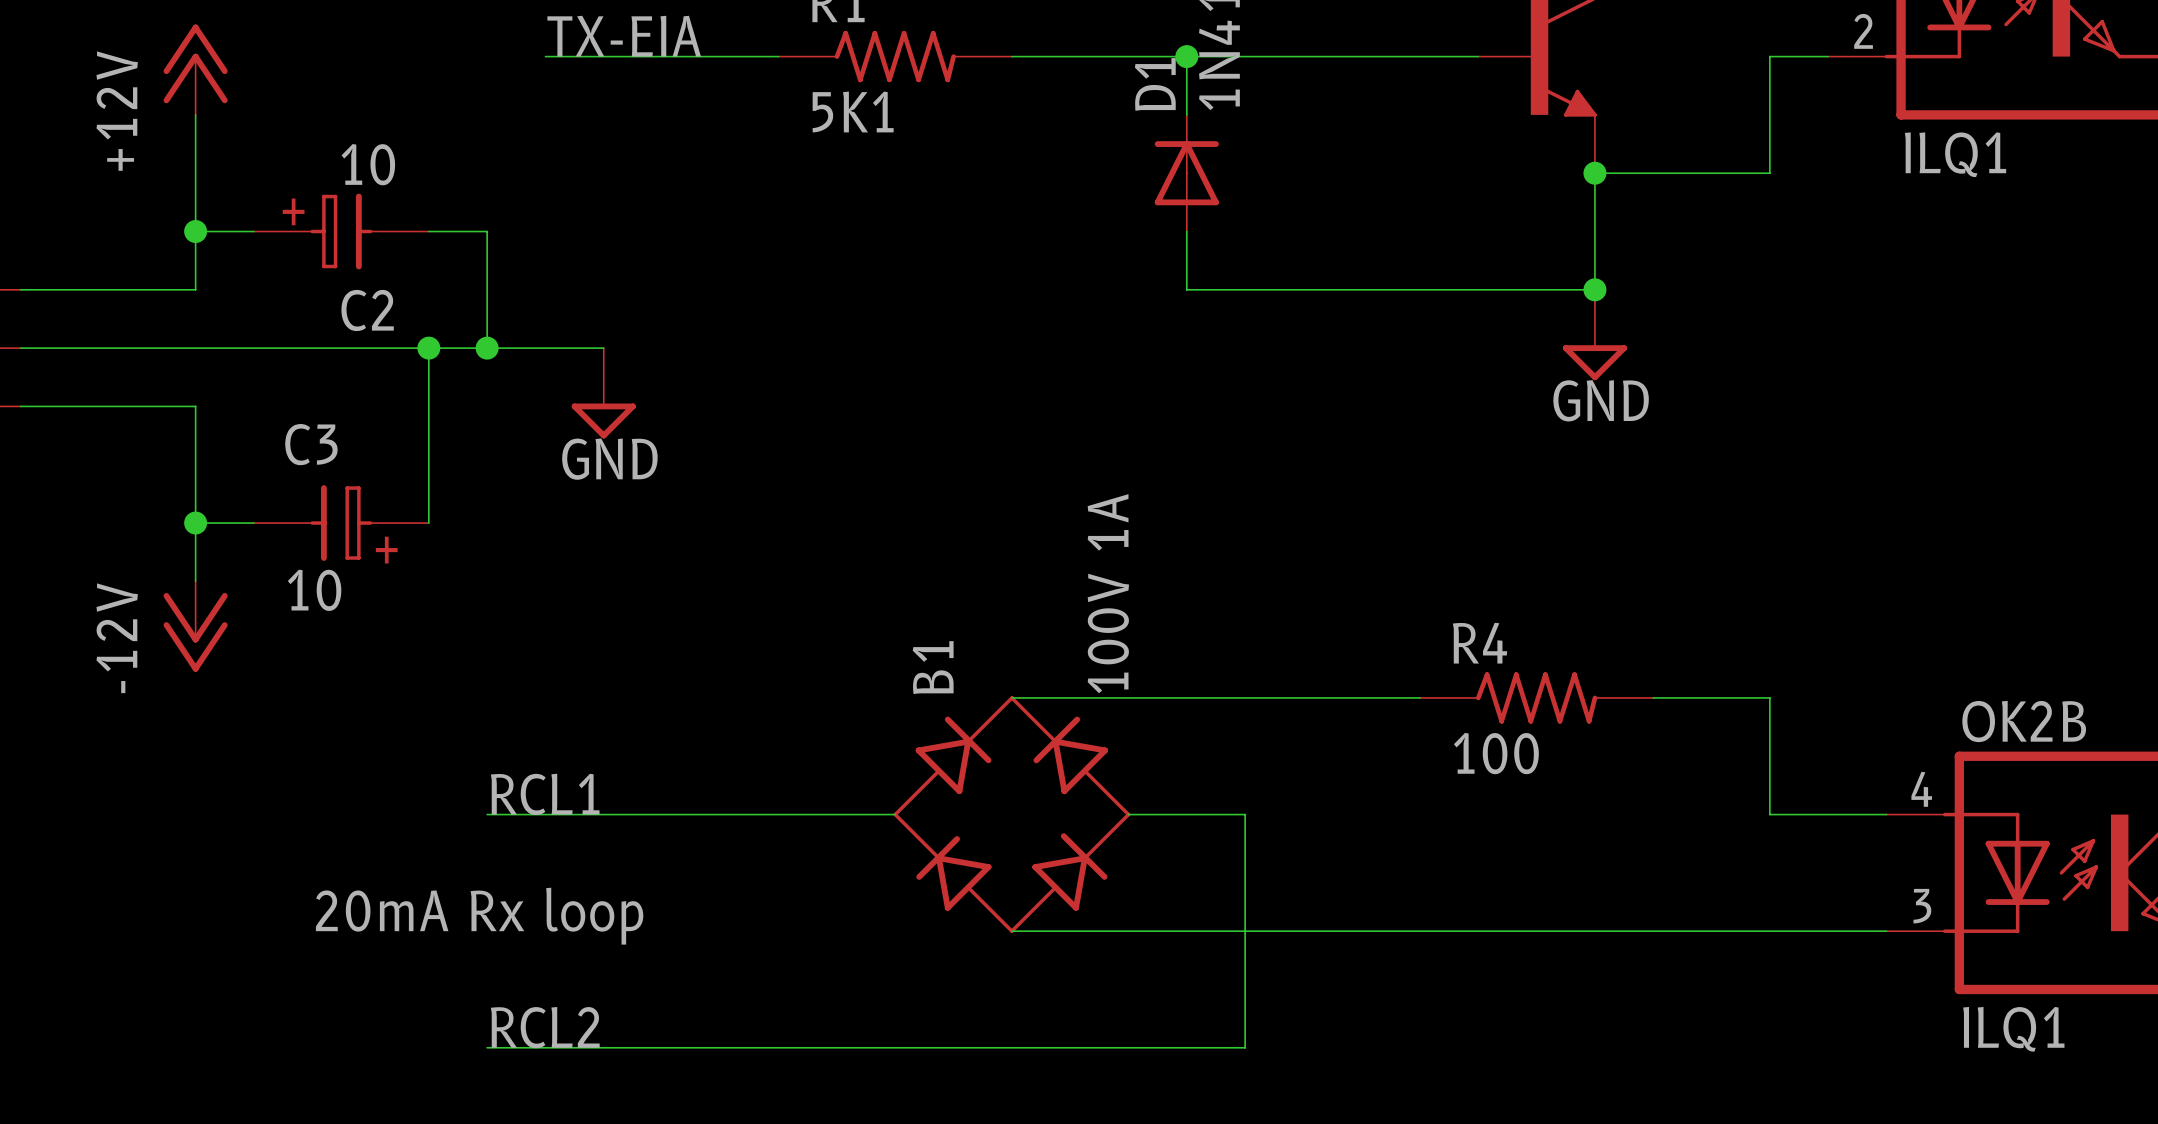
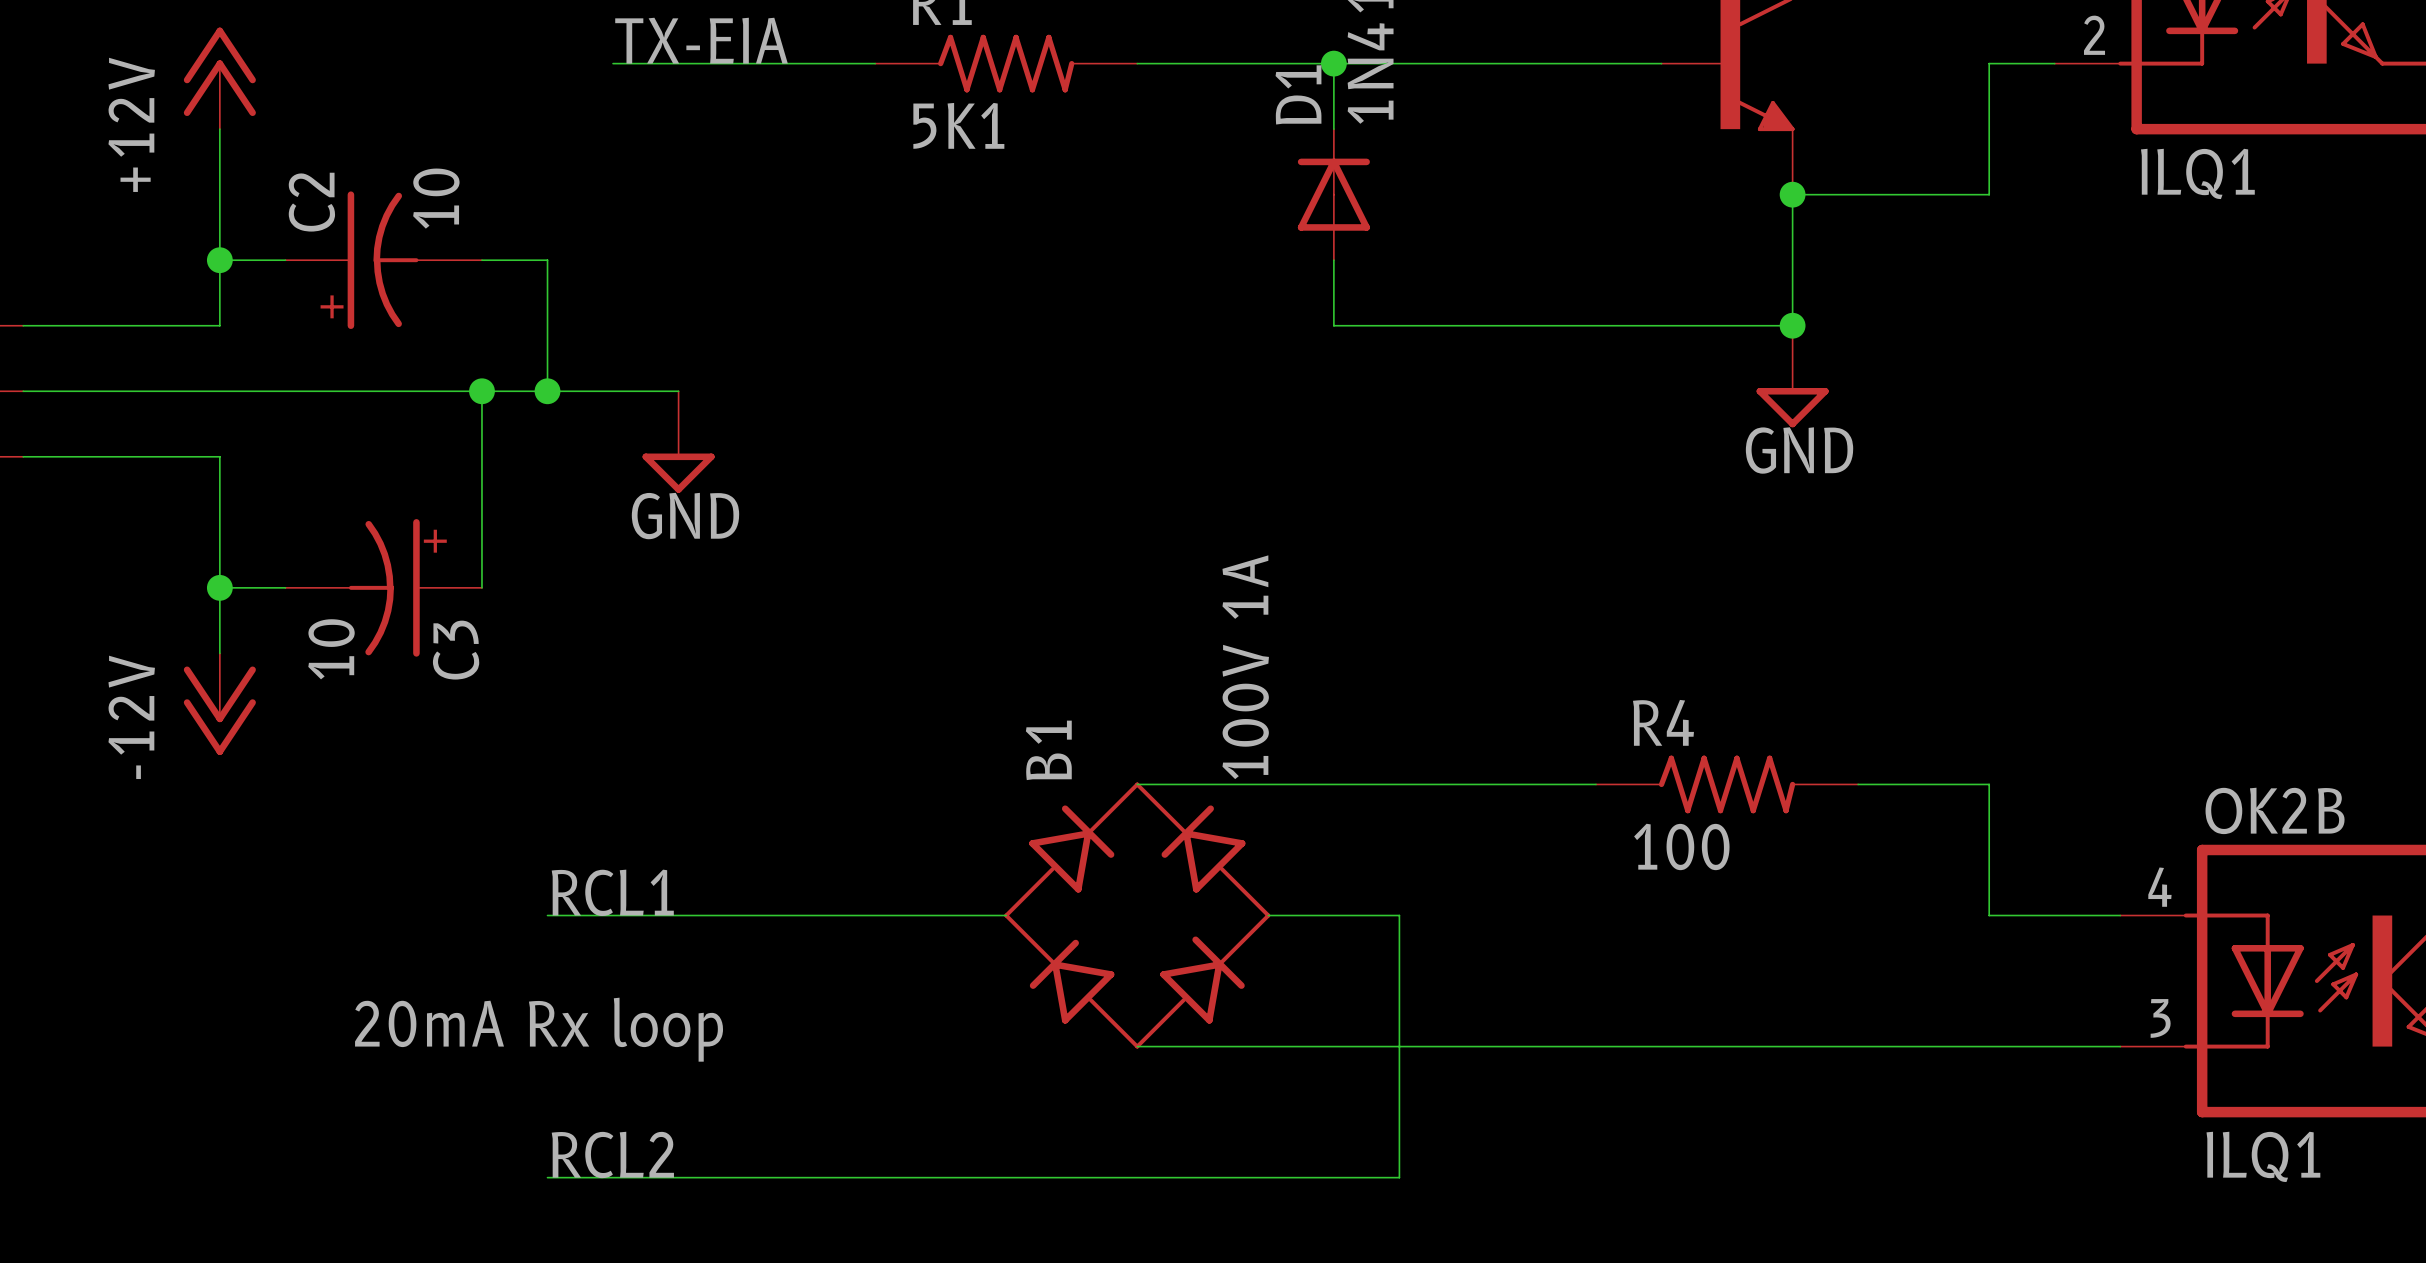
C2 symbol: [253, 193, 429, 270] -> [285, 191, 482, 330]
C2 name position: C2 (367, 310) -> C2 (311, 202)
C3 name position: C3 (311, 444) -> C3 (456, 650)
C3 symbol: [253, 485, 429, 561] -> [285, 519, 482, 657]

